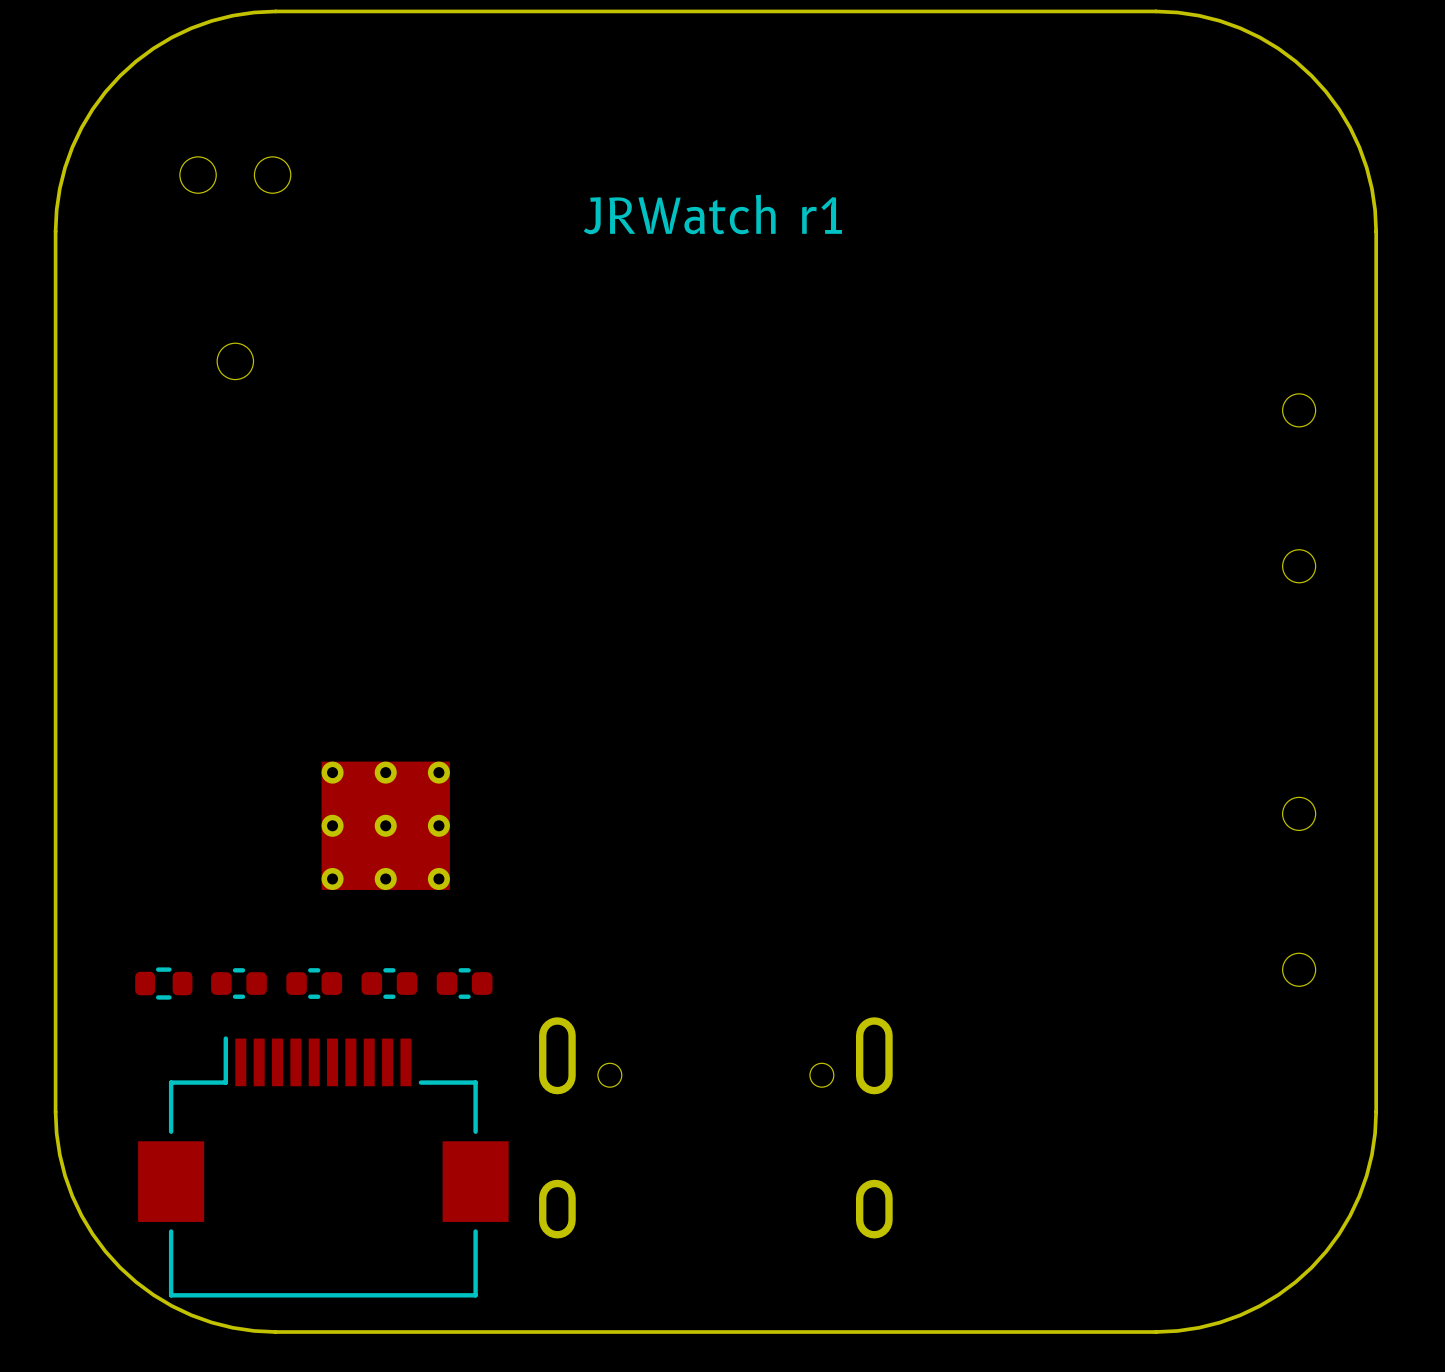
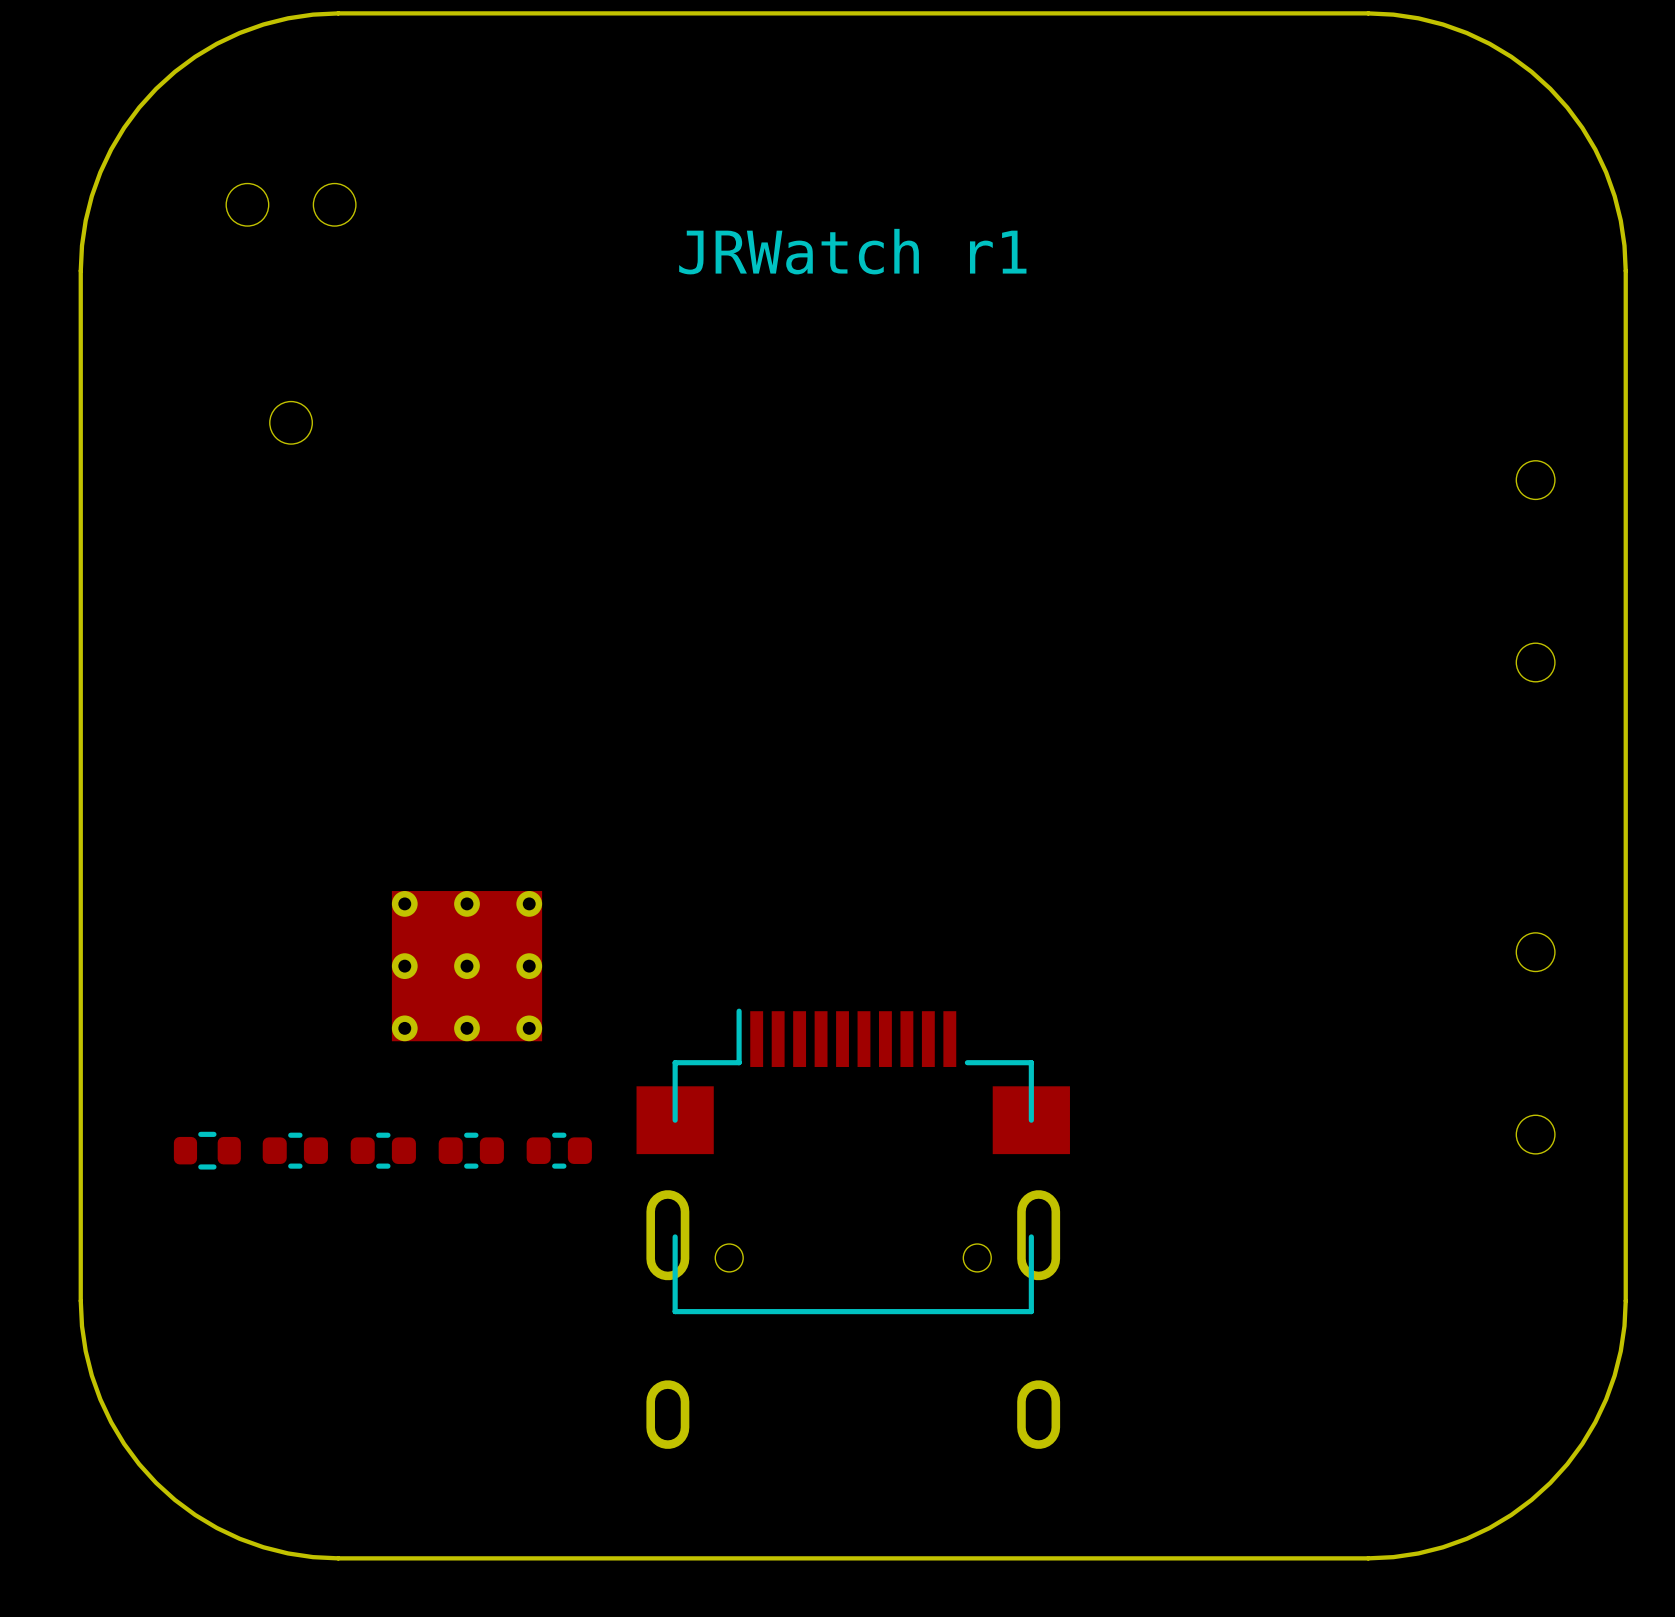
part: none -> (853, 1161)
part: (323, 1166) -> none

